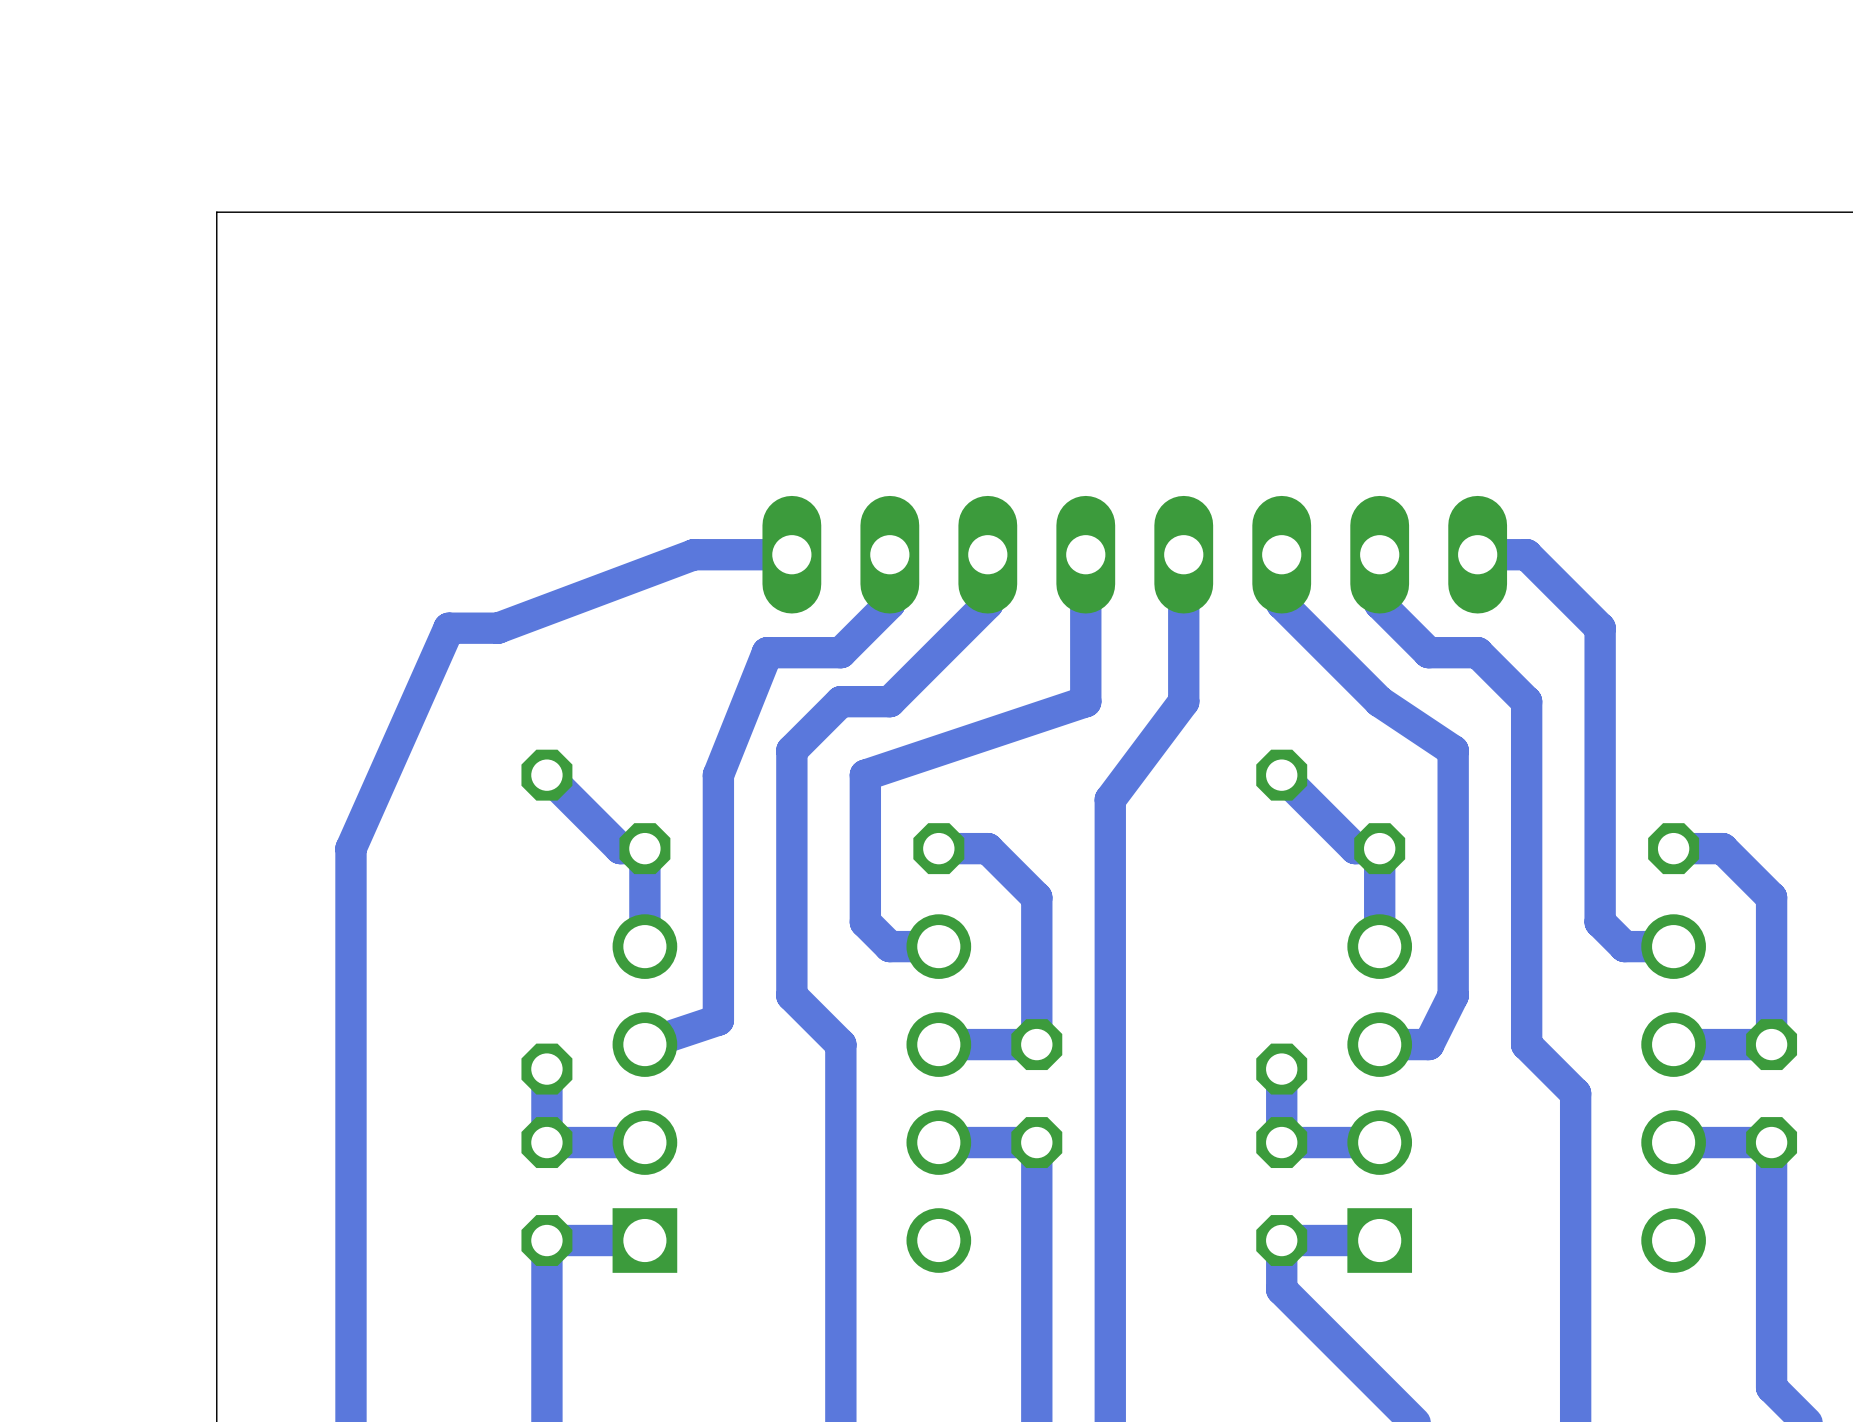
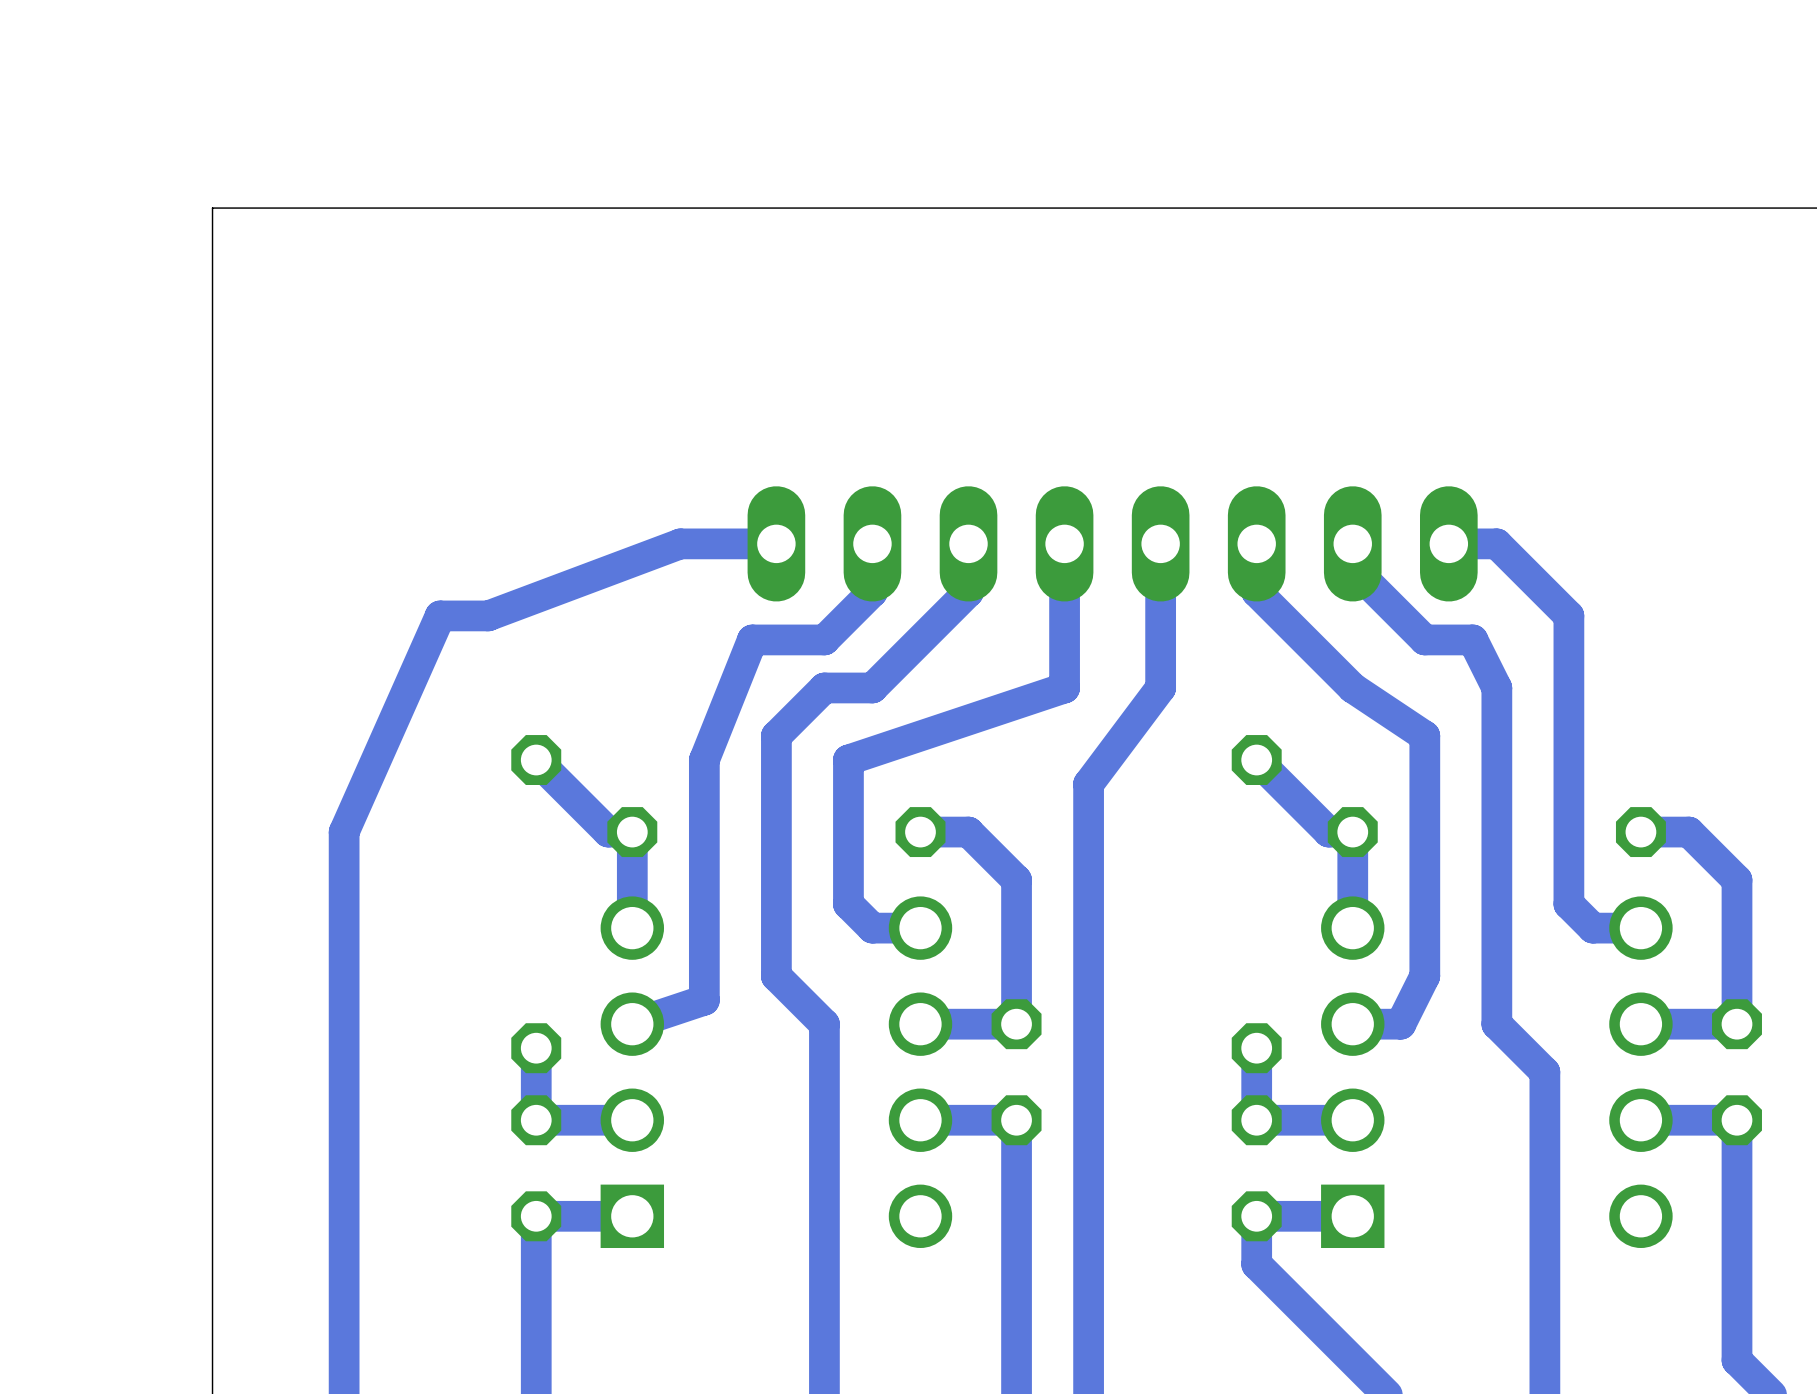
track: (1379, 579) (1379, 603) (1428, 652) (1453, 652) -> (1352, 567) (1424, 639)
track: (1477, 652) (1526, 701) -> (1448, 639) (1472, 639) (1496, 687)

